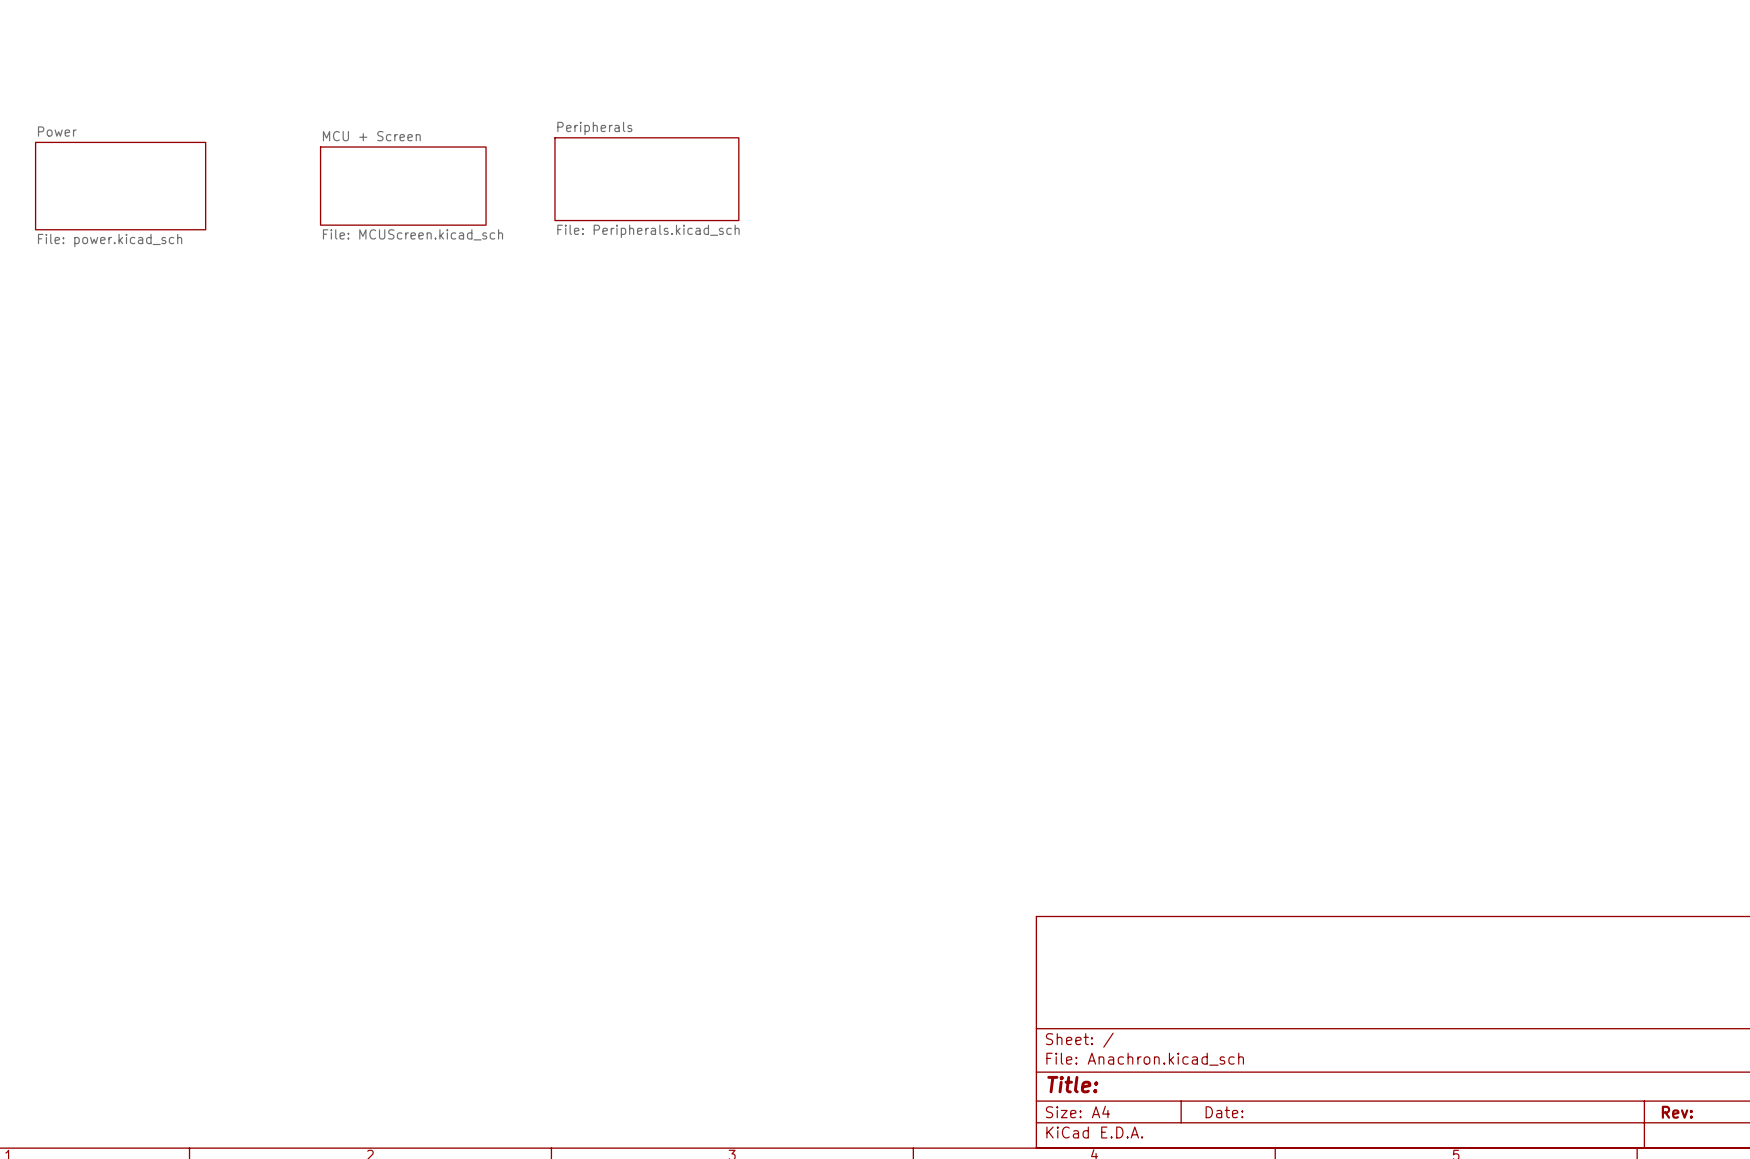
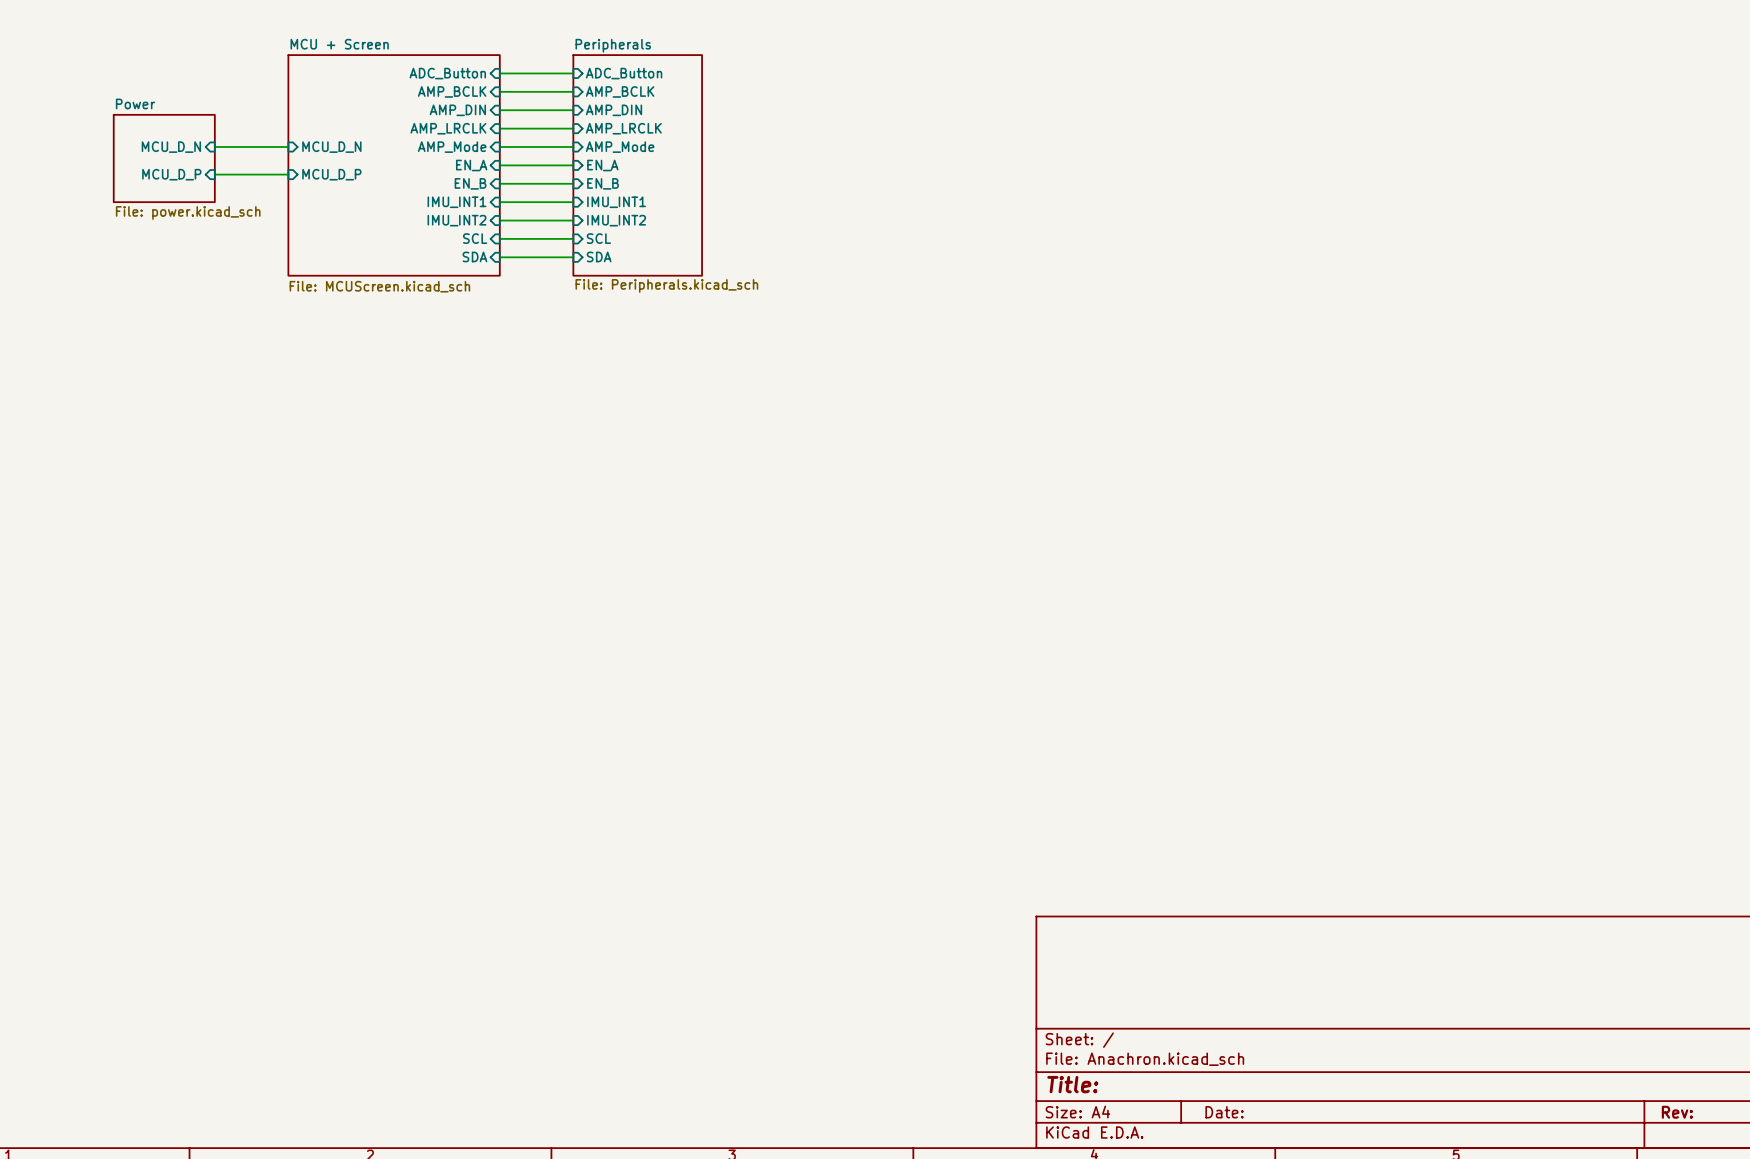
sheet pin: none -> ADC_Button (447, 73)
wire: none -> (499, 73) (573, 73)
sheet pin: none -> ADC_Button (624, 73)
sheet pin: none -> AMP_BCLK (452, 91)
wire: none -> (499, 91) (573, 91)
sheet pin: none -> AMP_BCLK (620, 91)
sheet pin: none -> AMP_DIN (457, 110)
wire: none -> (499, 110) (573, 110)
sheet pin: none -> AMP_DIN (613, 110)
sheet pin: none -> AMP_LRCLK (448, 128)
wire: none -> (499, 128) (573, 128)
sheet pin: none -> AMP_LRCLK (623, 128)
sheet pin: none -> MCU_D_N (171, 147)
wire: none -> (214, 147) (288, 147)
sheet pin: none -> MCU_D_N (331, 147)
sheet pin: none -> AMP_Mode (452, 147)
wire: none -> (499, 147) (573, 147)
sheet pin: none -> AMP_Mode (620, 147)
sheet Power: none -> File: power.kicad_sch (164, 158)
sheet MCU + Screen: none -> File: MCUScreen.kicad_sch (394, 165)
sheet pin: none -> EN_A (471, 165)
wire: none -> (499, 165) (573, 165)
sheet pin: none -> EN_A (602, 165)
sheet Peripherals: none -> File: Peripherals.kicad_sch (637, 165)
sheet pin: none -> MCU_D_P (171, 174)
wire: none -> (214, 174) (288, 174)
sheet pin: none -> MCU_D_P (331, 174)
sheet Peripherals: File: Peripherals.kicad_sch (646, 179) -> none
sheet pin: none -> EN_B (470, 183)
wire: none -> (499, 183) (573, 183)
sheet pin: none -> EN_B (603, 183)
sheet Power: File: power.kicad_sch (120, 186) -> none
sheet MCU + Screen: File: MCUScreen.kicad_sch (403, 186) -> none
sheet pin: none -> IMU_INT1 (456, 202)
wire: none -> (499, 202) (573, 202)
sheet pin: none -> IMU_INT1 (616, 202)
sheet pin: none -> IMU_INT2 (456, 220)
wire: none -> (499, 220) (573, 220)
sheet pin: none -> IMU_INT2 (616, 220)
sheet pin: none -> SCL (475, 238)
wire: none -> (499, 238) (573, 238)
sheet pin: none -> SCL (598, 238)
sheet pin: none -> SDA (474, 256)
sheet pin: none -> SDA (599, 256)
wire: none -> (499, 257) (573, 257)

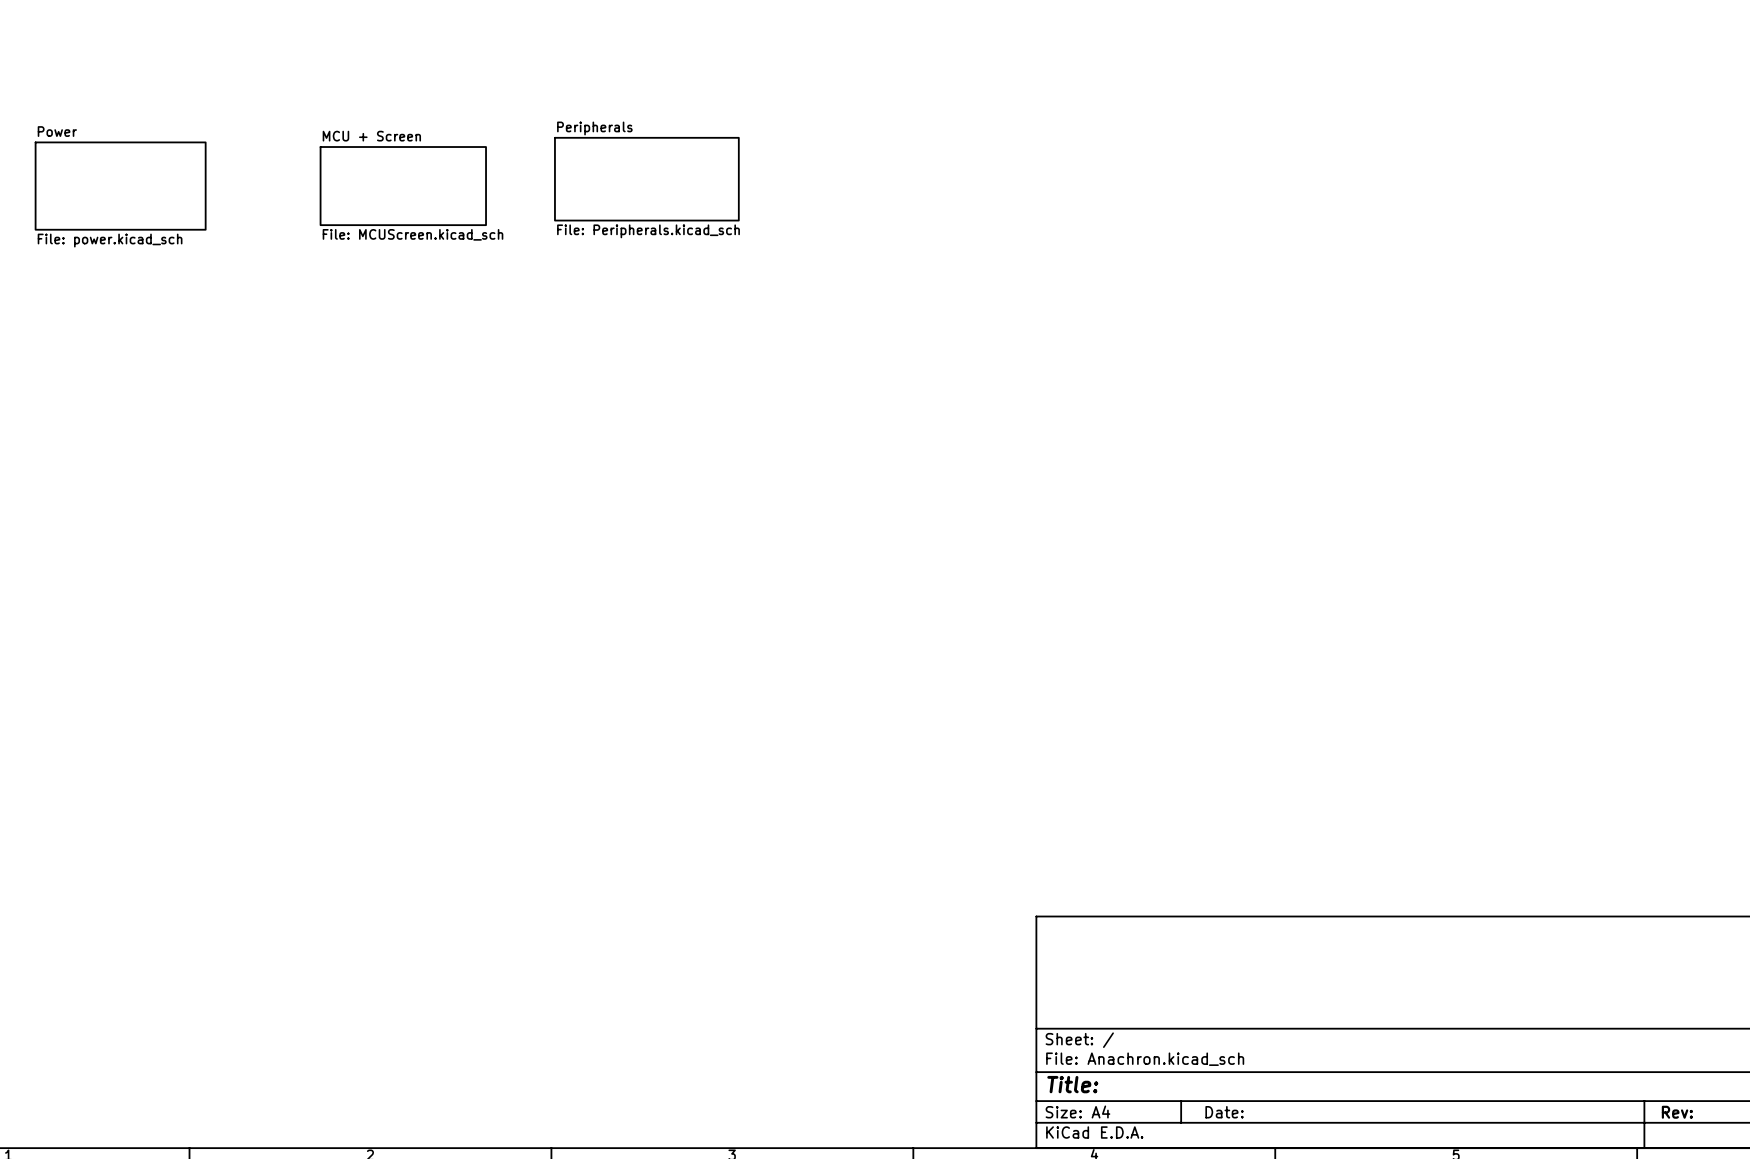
sheet pin: ADC_Button (447, 73) -> none
wire: (499, 73) (573, 73) -> none
sheet pin: ADC_Button (624, 73) -> none
sheet pin: AMP_BCLK (452, 91) -> none
wire: (499, 91) (573, 91) -> none
sheet pin: AMP_BCLK (620, 91) -> none
sheet pin: AMP_DIN (457, 110) -> none
wire: (499, 110) (573, 110) -> none
sheet pin: AMP_DIN (613, 110) -> none
sheet pin: AMP_LRCLK (448, 128) -> none
wire: (499, 128) (573, 128) -> none
sheet pin: AMP_LRCLK (623, 128) -> none
sheet pin: MCU_D_N (171, 147) -> none
wire: (214, 147) (288, 147) -> none
sheet pin: MCU_D_N (331, 147) -> none
sheet pin: AMP_Mode (452, 147) -> none
wire: (499, 147) (573, 147) -> none
sheet pin: AMP_Mode (620, 147) -> none
sheet Power: File: power.kicad_sch (164, 158) -> none
sheet MCU + Screen: File: MCUScreen.kicad_sch (394, 165) -> none
sheet pin: EN_A (471, 165) -> none
wire: (499, 165) (573, 165) -> none
sheet pin: EN_A (602, 165) -> none
sheet Peripherals: File: Peripherals.kicad_sch (637, 165) -> none
sheet pin: MCU_D_P (171, 174) -> none
wire: (214, 174) (288, 174) -> none
sheet pin: MCU_D_P (331, 174) -> none
sheet Peripherals: none -> File: Peripherals.kicad_sch (646, 179)
sheet pin: EN_B (470, 183) -> none
wire: (499, 183) (573, 183) -> none
sheet pin: EN_B (603, 183) -> none
sheet Power: none -> File: power.kicad_sch (120, 186)
sheet MCU + Screen: none -> File: MCUScreen.kicad_sch (403, 186)
sheet pin: IMU_INT1 (456, 202) -> none
wire: (499, 202) (573, 202) -> none
sheet pin: IMU_INT1 (616, 202) -> none
sheet pin: IMU_INT2 (456, 220) -> none
wire: (499, 220) (573, 220) -> none
sheet pin: IMU_INT2 (616, 220) -> none
sheet pin: SCL (475, 238) -> none
wire: (499, 238) (573, 238) -> none
sheet pin: SCL (598, 238) -> none
sheet pin: SDA (474, 256) -> none
sheet pin: SDA (599, 256) -> none
wire: (499, 257) (573, 257) -> none

